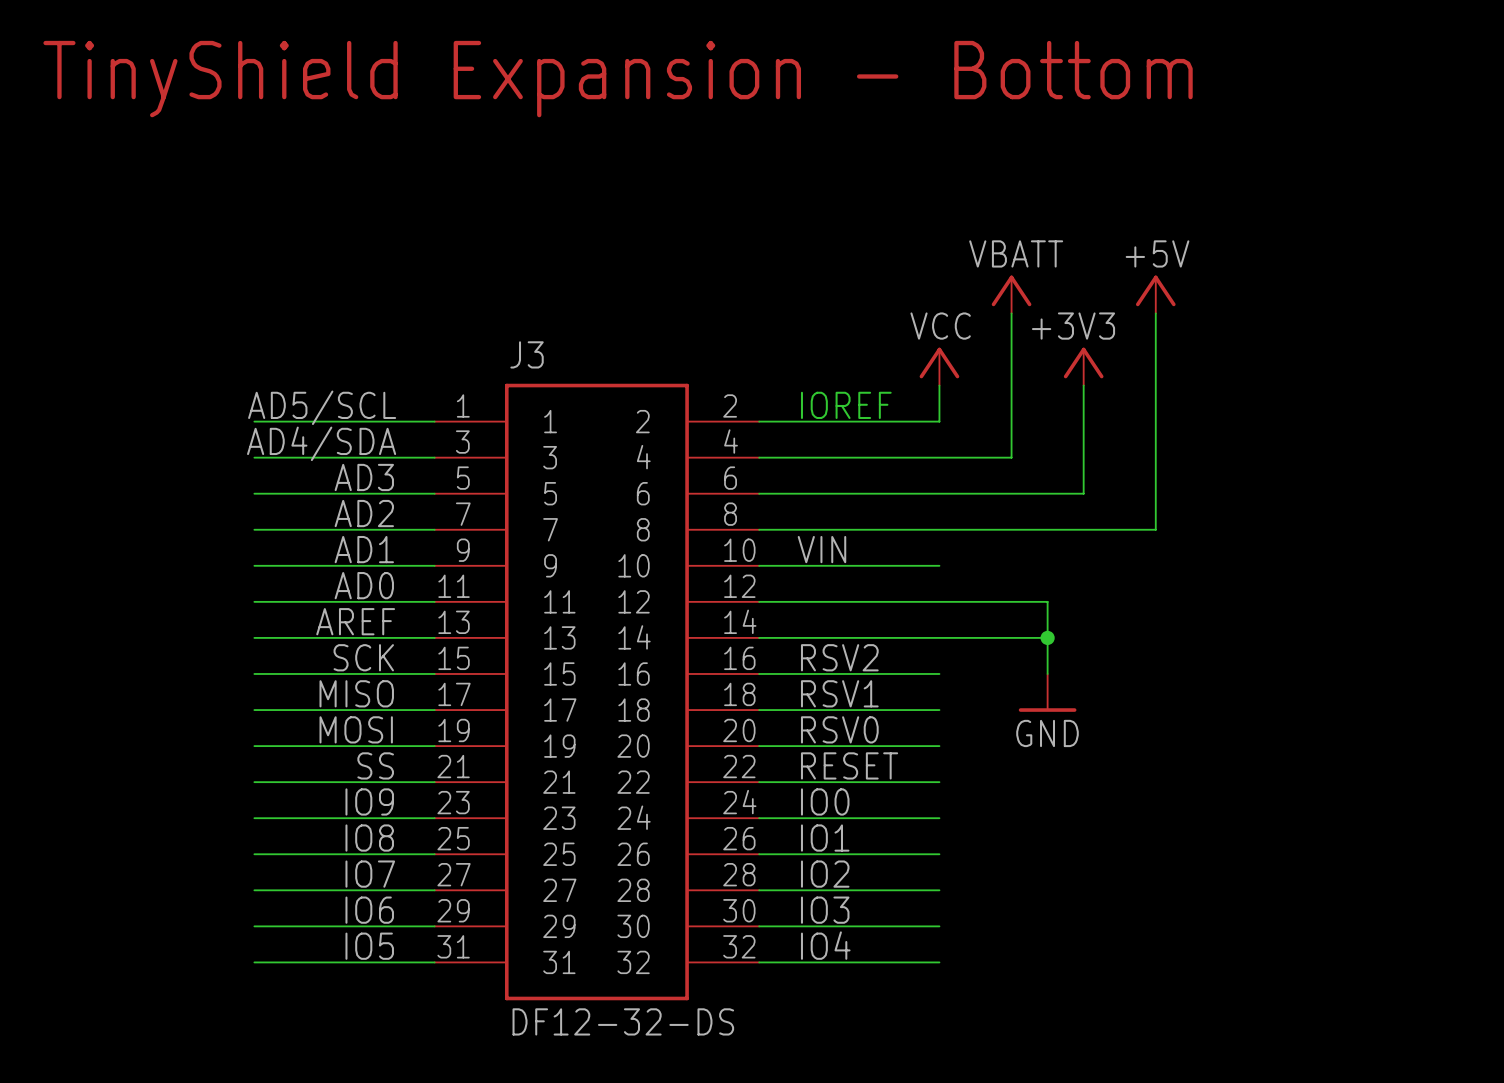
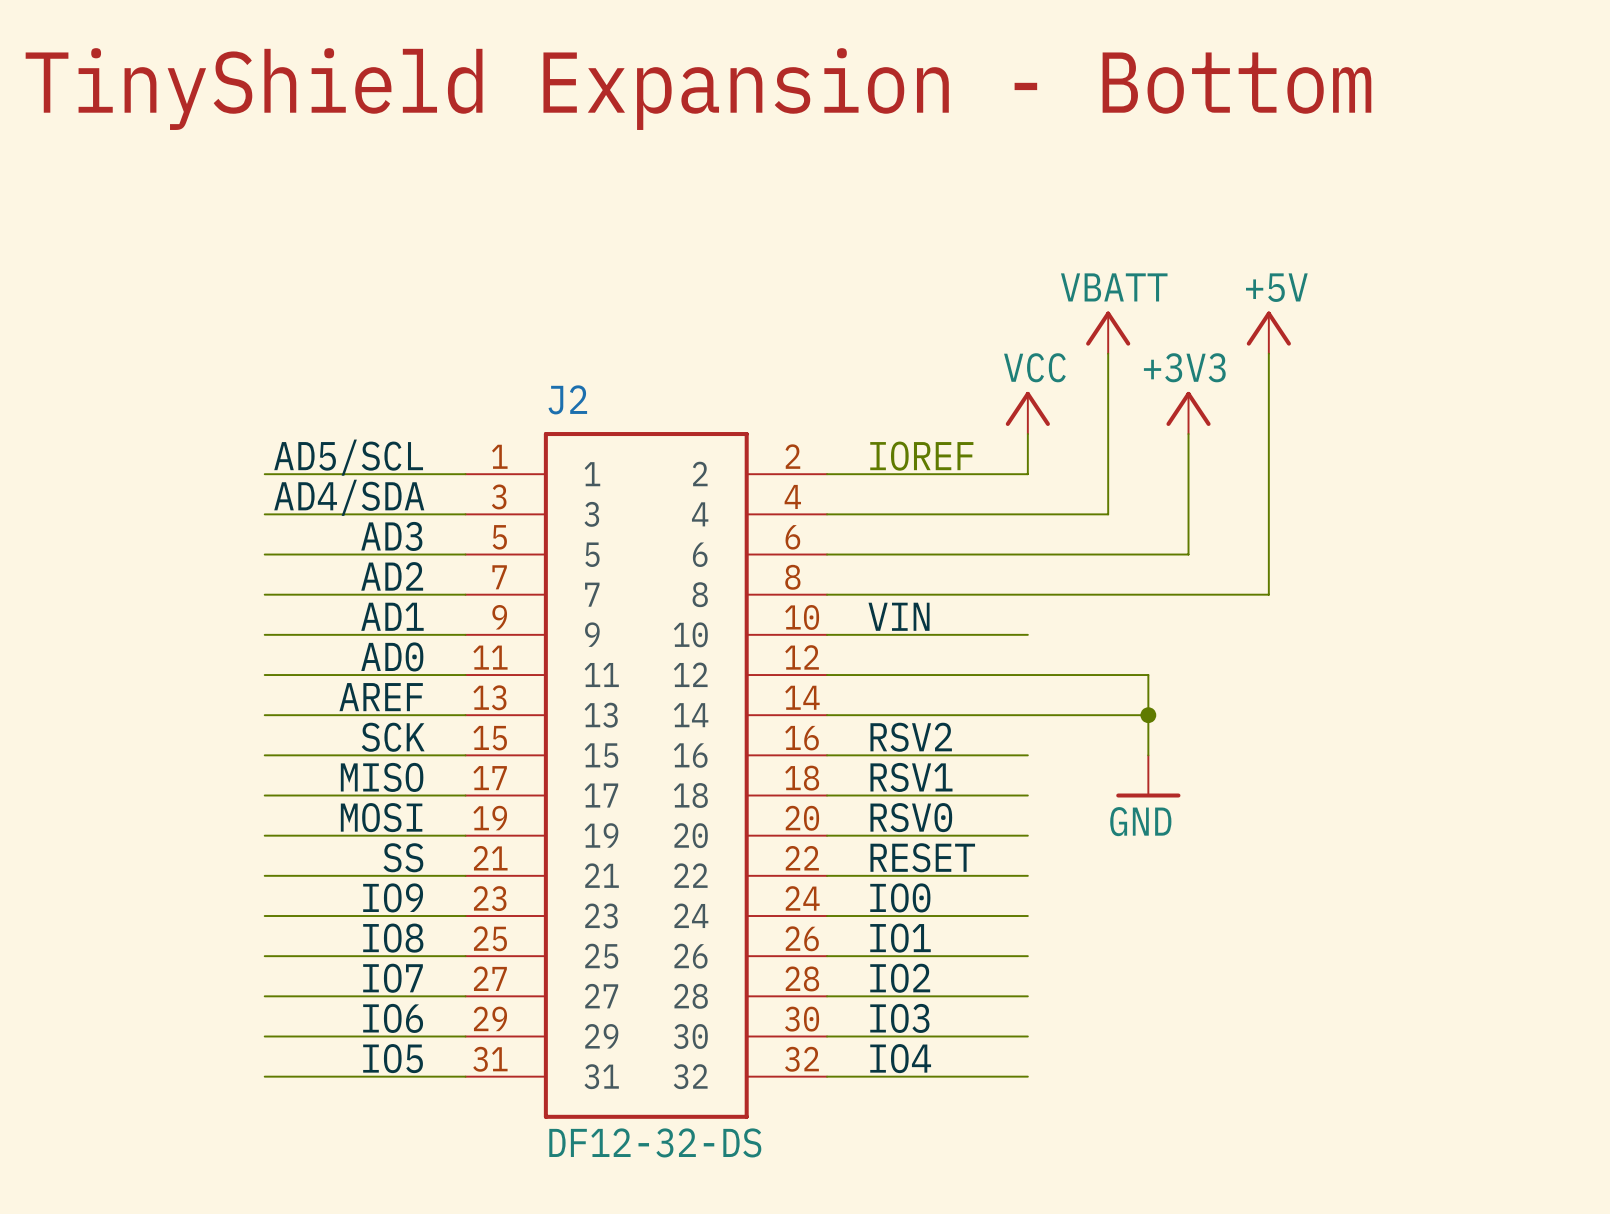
J3 name: J3 (527, 354) -> J2 (567, 399)

